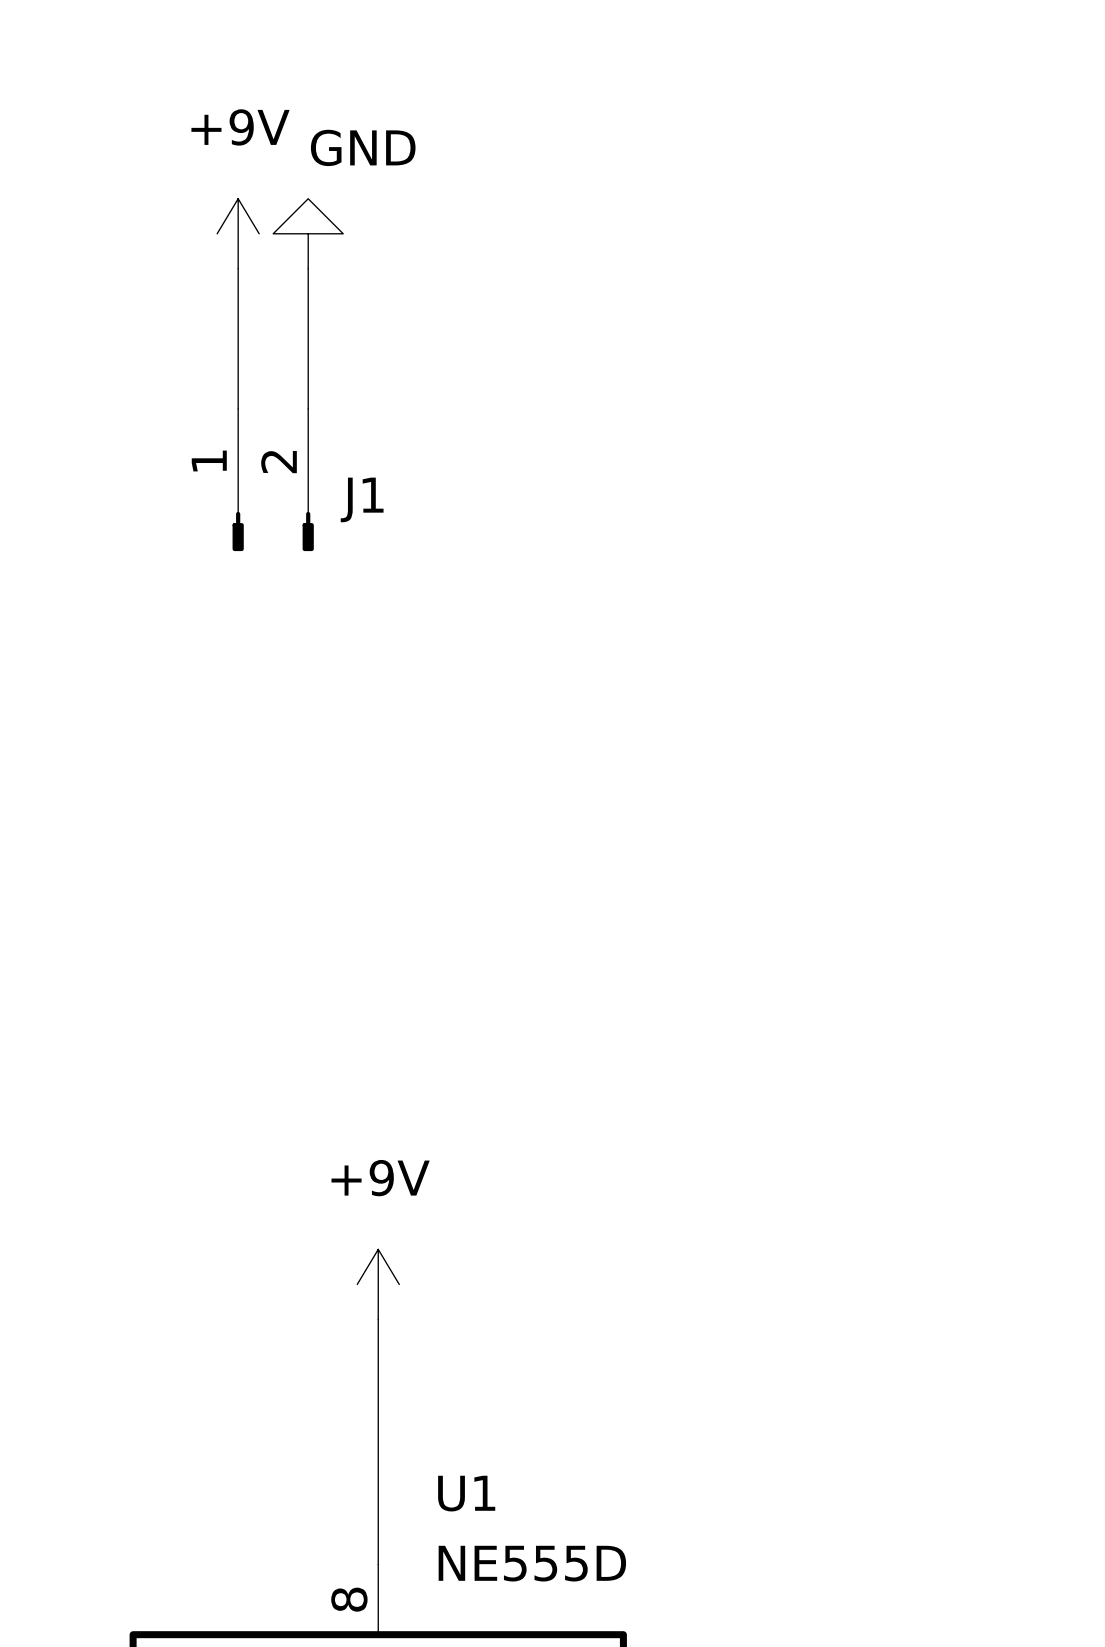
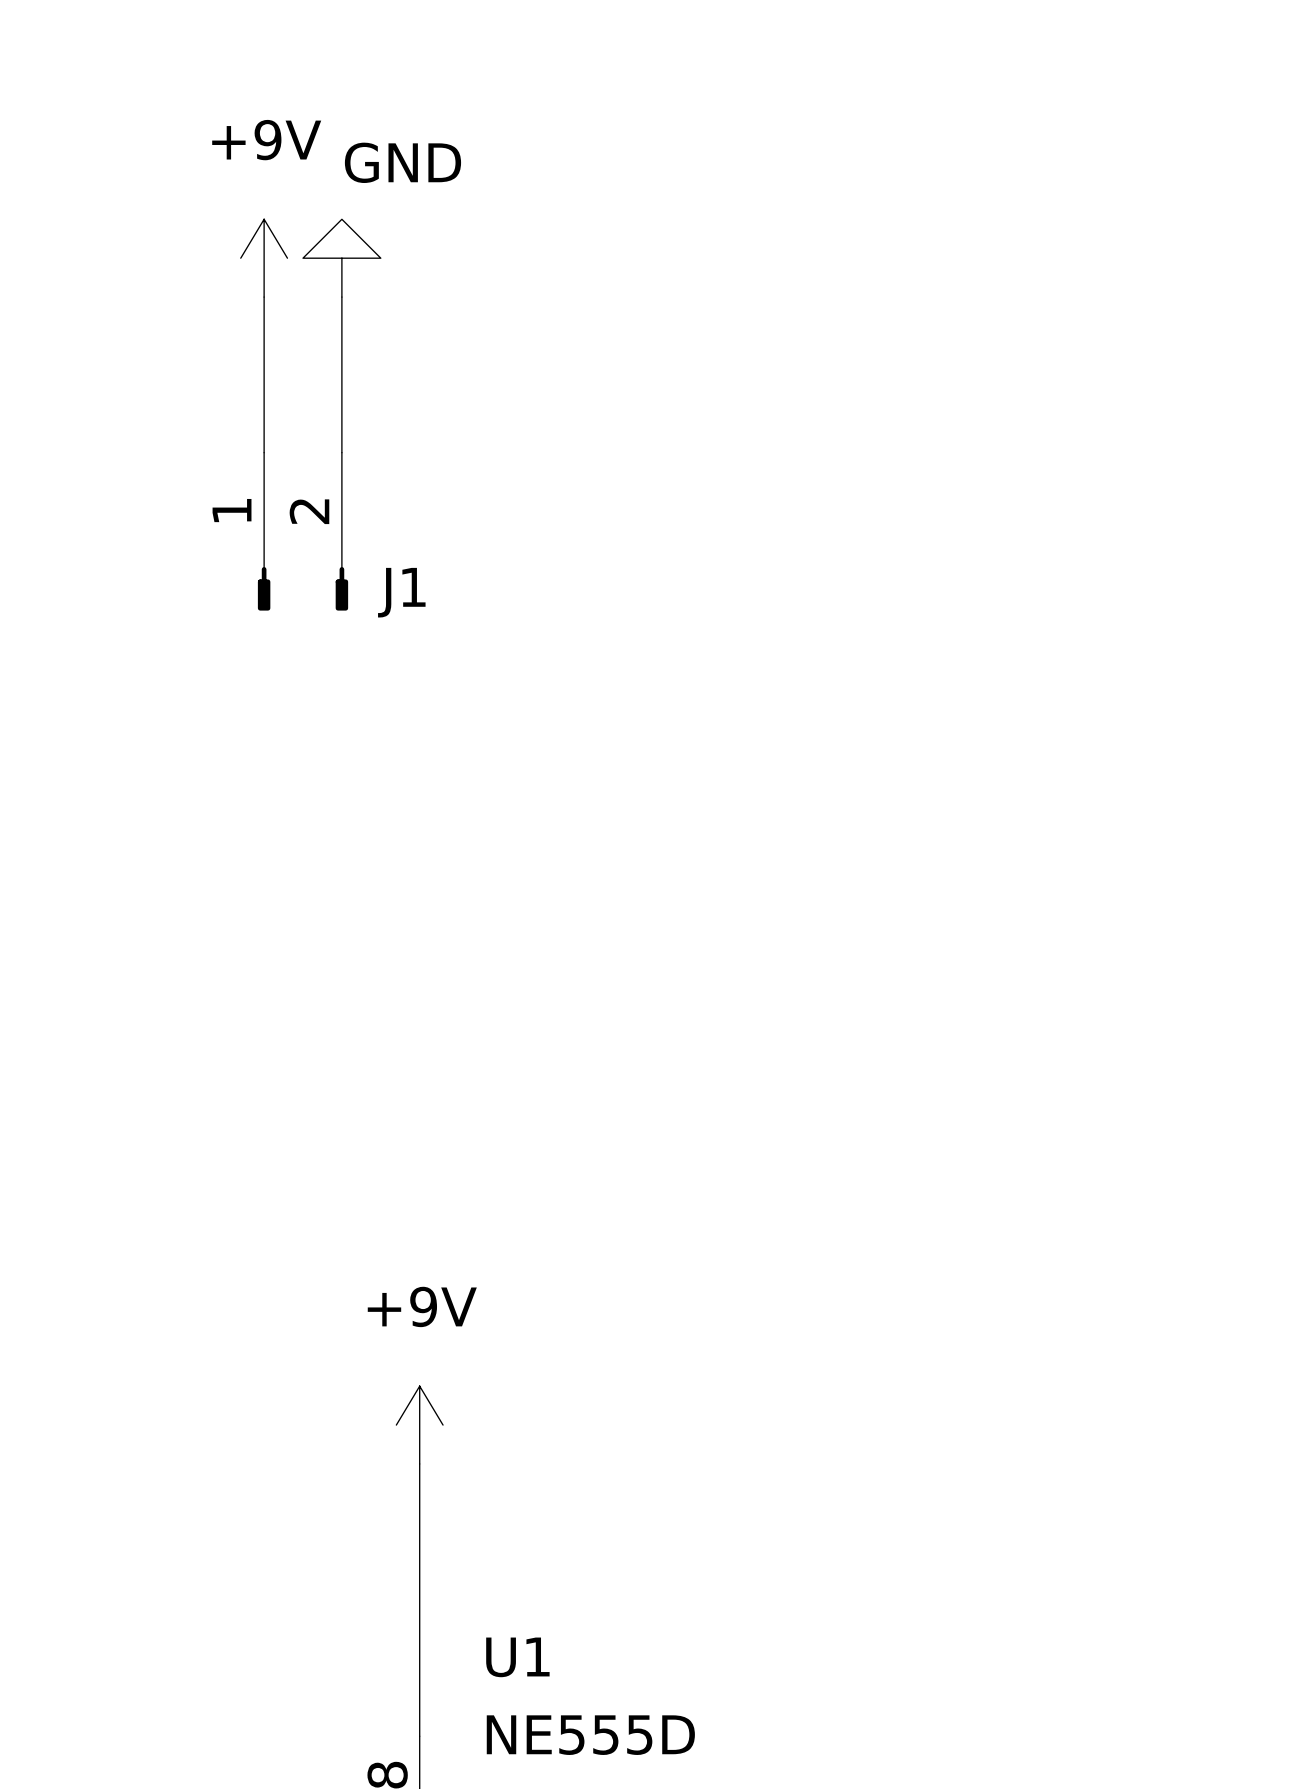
J1 name position: J1 (362, 499) -> J1 (401, 592)

